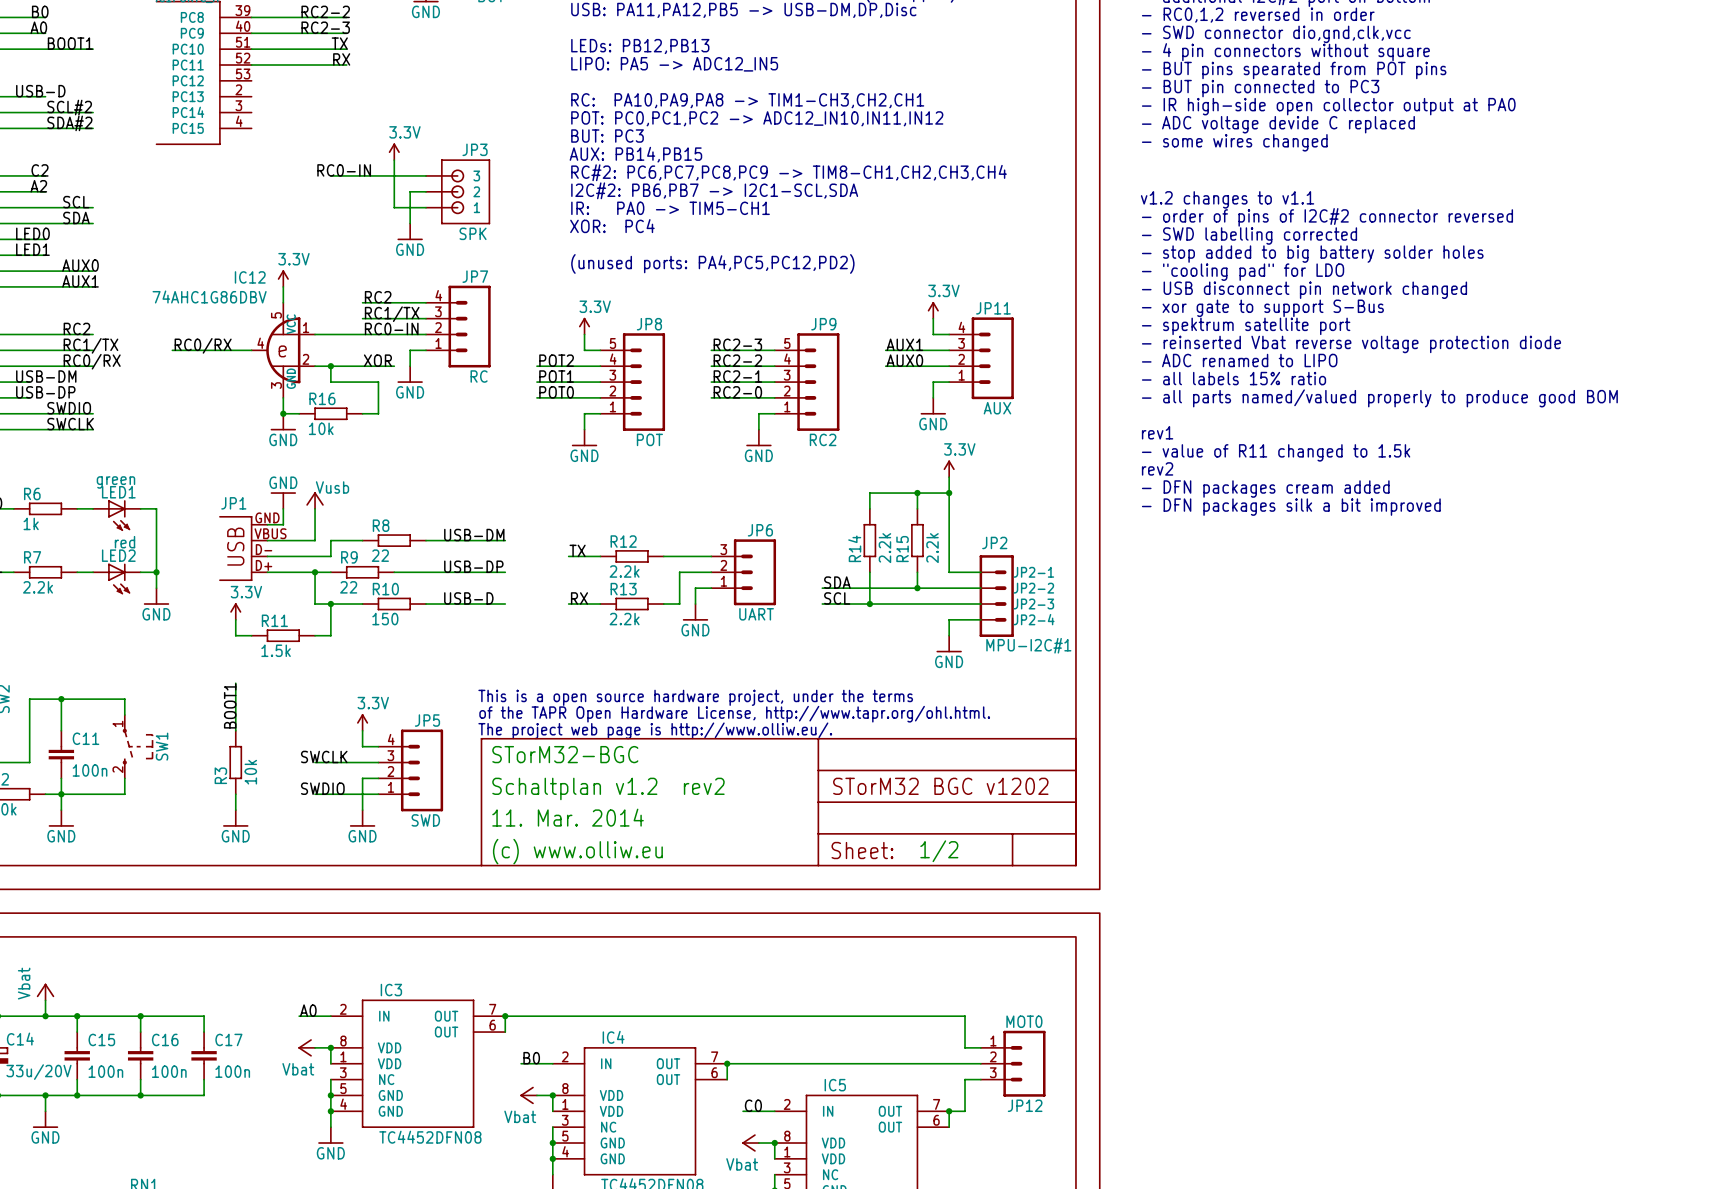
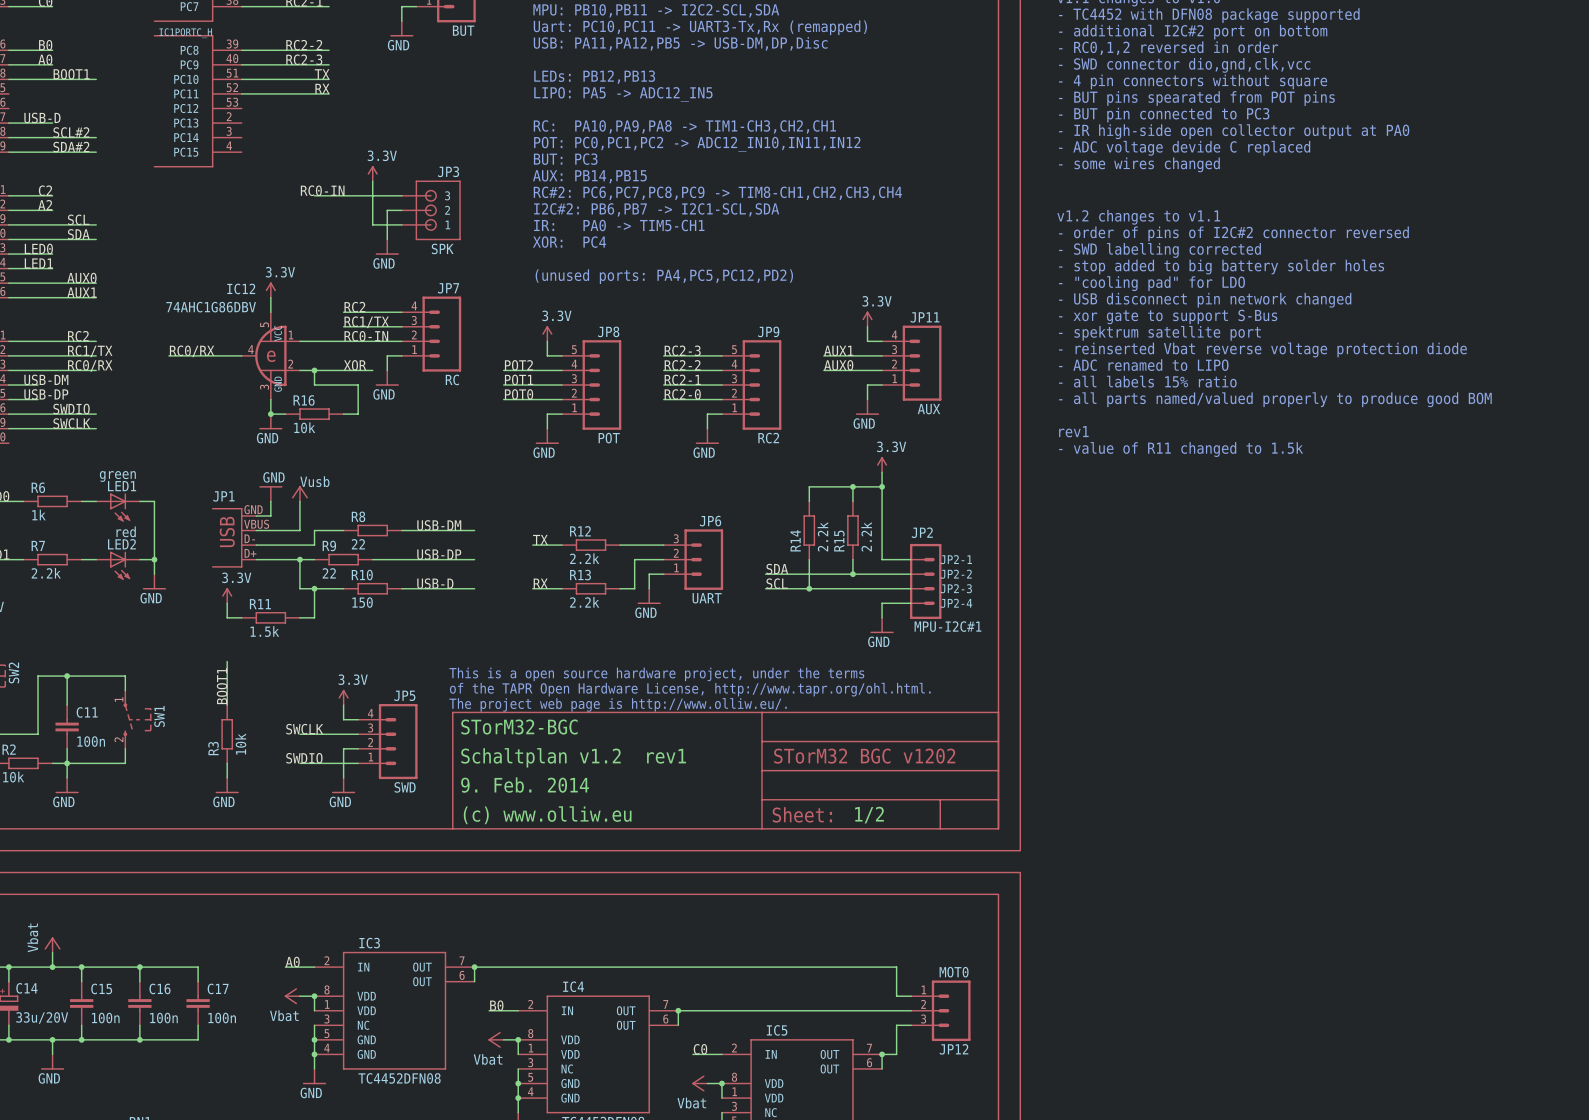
text: rev2 (1157, 468) -> none
text: - DFN packages cream added (1265, 489) -> none
text: - DFN packages silk a bit improved (1291, 507) -> none
text: Schaltplan v1.2 rev2 (608, 788) -> Schaltplan v1.2 rev1 (573, 757)
text: 11. Mar. 2014 (568, 817) -> 9. Feb. 2014 (525, 785)

